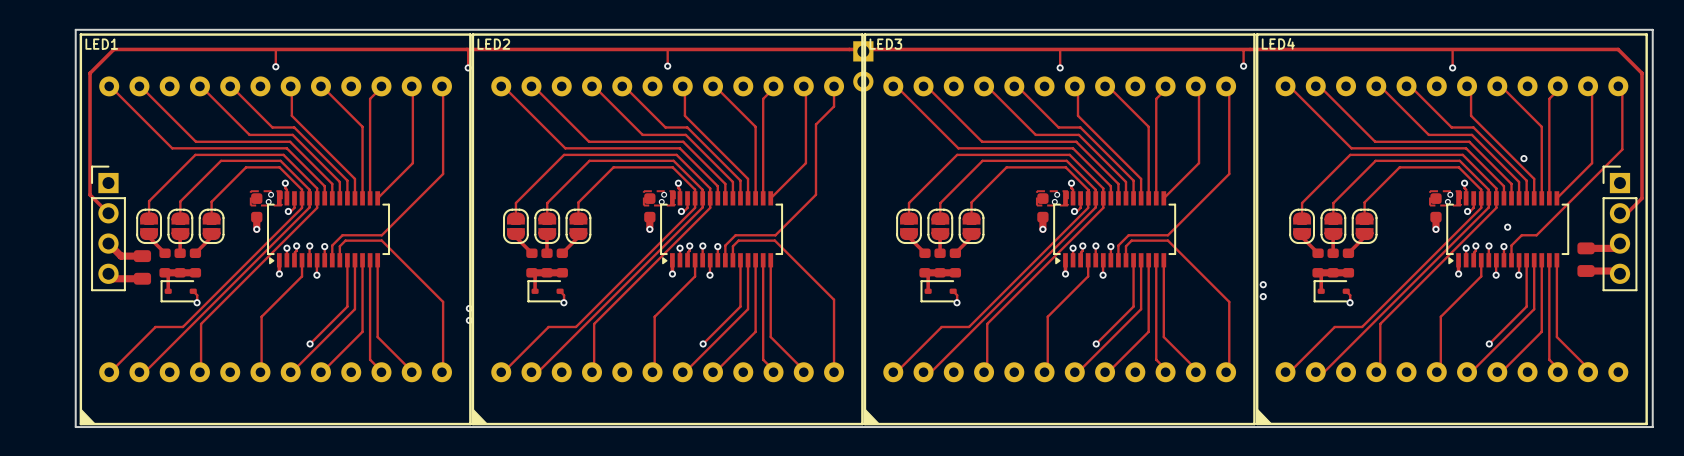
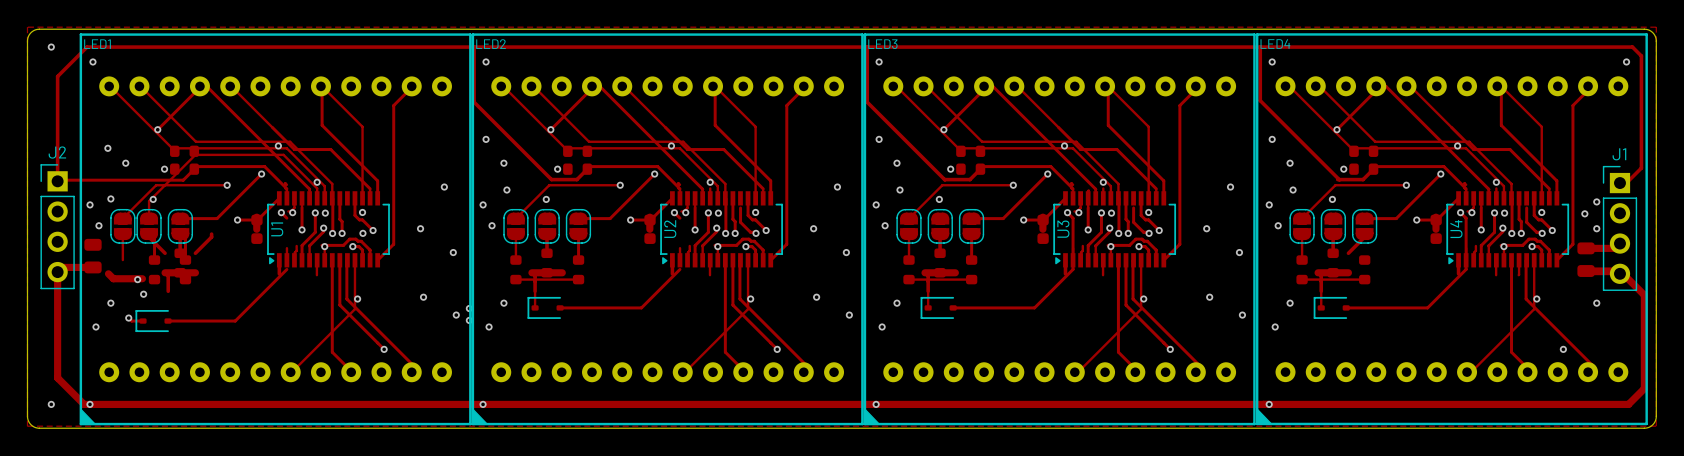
zone outline: none -> (27, 27) (27, 426) (1656, 426) (1656, 27) (27, 27)
board edge: (75, 29) (1652, 29) (1652, 427) (75, 427) (75, 29) -> (39, 29) (30, 32) (27, 41) (27, 416) (30, 423) (36, 427) (1644, 428) (1651, 425) (1656, 418) (1656, 41) (1653, 33) (1647, 29) (39, 29)
via: none -> (51, 47)
track: none -> (474, 47) (474, 102) (551, 179) (576, 179) (589, 166) (657, 166) (679, 188)
track: none -> (867, 47) (867, 102) (944, 179)
track: none -> (1260, 47) (1260, 100) (1339, 179)
track: (467, 49) (468, 67) -> none
track: (667, 49) (667, 66) -> (535, 291) (535, 307)
track: (1063, 49) (1060, 49) (1060, 67) -> none
track: (1242, 49) (1243, 66) -> none
track: (1456, 49) (1452, 49) (1452, 67) -> none
track: (275, 50) (275, 66) -> none
via: none -> (92, 61)
via: none -> (879, 61)
via: none -> (1626, 61)
via: (275, 66) -> none
via: (667, 66) -> none
part: (863, 66) -> none
via position: (1243, 66) -> (1272, 61)
via position: (468, 67) -> (486, 61)
via: (1060, 67) -> none
via: (1452, 67) -> none
track: (199, 86) (249, 134) (292, 134) (339, 181) (339, 198) -> (342, 233) (339, 198)
track: (290, 86) (291, 115) (354, 178) (354, 198) -> (373, 230) (354, 215) (354, 198)
track: (381, 86) (370, 98) (370, 188) -> none
track: (411, 86) (412, 163) (377, 198) -> (322, 86) (322, 125) (377, 180) (377, 198)
track: (441, 86) (443, 173) (381, 235) (342, 235) (332, 245) (332, 260) -> (352, 372) (332, 352) (332, 260)
track: (592, 86) (642, 134) (685, 134) (732, 181) (732, 198) -> (735, 233) (732, 198)
track: (683, 86) (684, 115) (748, 178) (748, 198) -> (766, 230) (748, 215) (748, 198)
track: (774, 86) (763, 98) (763, 188) -> none
track: (804, 86) (805, 163) (770, 198) -> (715, 86) (715, 125) (770, 180) (770, 198)
track: (834, 86) (834, 106) (815, 124) (815, 194) (775, 235) (735, 235) (725, 245) (725, 260) -> (745, 372) (725, 352) (725, 260)
track: (985, 86) (1035, 134) (1078, 134) (1125, 181) (1125, 198) -> (1128, 233) (1125, 198)
track: (1076, 86) (1077, 115) (1141, 178) (1141, 198) -> (1159, 230) (1141, 215) (1141, 198)
track: (1167, 86) (1156, 98) (1156, 188) -> none
track: (1197, 86) (1199, 163) (1163, 198) -> (1108, 86) (1108, 125) (1163, 180) (1163, 198)
track: (1227, 86) (1229, 173) (1167, 235) (1128, 235) (1118, 245) (1118, 260) -> (1138, 372) (1118, 352) (1118, 260)
track: (1378, 86) (1428, 134) (1471, 134) (1519, 181) (1519, 198) -> (1521, 233) (1519, 198)
track: (1469, 86) (1471, 115) (1534, 178) (1534, 198) -> (1552, 230) (1534, 215) (1534, 198)
track: (1560, 86) (1549, 98) (1549, 188) -> none
track: (1590, 86) (1592, 163) (1556, 198) -> (1501, 86) (1501, 125) (1556, 180) (1556, 198)
track: (1620, 86) (1622, 149) (1536, 235) (1521, 235) (1511, 245) (1511, 260) -> (1531, 372) (1511, 352) (1511, 260)
track: (272, 127) (294, 127) (347, 180) (347, 198) -> (272, 127) (294, 149) (330, 149) (370, 188)
track: (665, 127) (687, 127) (740, 180) (740, 198) -> (665, 127) (687, 149) (723, 149) (763, 188)
track: (1058, 127) (1080, 127) (1133, 180) (1133, 198) -> (1058, 127) (1080, 149) (1116, 149) (1156, 188)
track: (1451, 127) (1473, 127) (1526, 180) (1526, 198) -> (1451, 127) (1473, 149) (1510, 149) (1549, 188)
via: none -> (157, 129)
via: none -> (550, 129)
via: none -> (943, 129)
via: none -> (1336, 129)
via: none -> (486, 139)
via: none -> (879, 139)
via: none -> (1272, 139)
via: none -> (278, 145)
via: none -> (671, 145)
via: none -> (1064, 145)
via: none -> (1457, 145)
via: none -> (107, 148)
part: none -> (184, 151)
part: none -> (577, 151)
part: none -> (970, 151)
part: none -> (1363, 151)
J1 name: none -> J1 (1619, 154)
via: (1523, 158) -> none
via: none -> (125, 163)
via: none -> (503, 163)
via: none -> (896, 163)
via: none -> (1290, 163)
via: none -> (164, 169)
part: none -> (184, 169)
via: none -> (557, 169)
part: none -> (577, 169)
via: none -> (950, 169)
part: none -> (970, 169)
via: none -> (1343, 169)
part: none -> (1363, 169)
track: none -> (261, 174) (217, 218) (185, 218)
via: none -> (261, 174)
via: none -> (654, 174)
via: none -> (1047, 174)
via: none -> (1440, 174)
track: none -> (944, 179) (969, 179) (983, 166) (1050, 166) (1073, 188)
track: none -> (1337, 179) (1363, 179) (1376, 166) (1443, 166) (1466, 188)
track: none -> (1628, 181) (1641, 168) (1641, 56) (1632, 47) (87, 47) (57, 76) (57, 181) (183, 180) (196, 166) (264, 166) (286, 188)
via: none -> (317, 182)
via: none -> (710, 182)
via: none -> (1103, 182)
via: none -> (1496, 182)
via: (285, 183) -> none
via: (678, 183) -> none
via: (1071, 183) -> none
via: (1464, 183) -> none
track: none -> (227, 185) (156, 185) (122, 218)
via: none -> (227, 185)
via: none -> (620, 185)
via: none -> (1013, 185)
via: none -> (1406, 185)
via: none -> (444, 187)
via: none -> (837, 187)
via: none -> (1230, 187)
track: (710, 188) (676, 154) (564, 154) (515, 203) (515, 218) -> (620, 185) (549, 185) (515, 218)
track: (1103, 188) (1069, 154) (957, 154) (909, 203) (909, 218) -> (1013, 185) (942, 185) (909, 218)
track: (1496, 188) (1462, 154) (1350, 154) (1302, 203) (1302, 218) -> (1406, 185) (1335, 185) (1302, 218)
track: (309, 189) (280, 160) (221, 160) (180, 201) (180, 218) -> (309, 189) (206, 86) (201, 86) (157, 129)
track: (702, 189) (673, 160) (589, 160) (547, 203) (547, 218) -> (702, 189) (599, 86) (594, 86) (550, 129)
track: (1095, 189) (1066, 160) (982, 160) (940, 203) (940, 218) -> (1095, 189) (992, 86) (987, 86) (943, 129)
track: (1488, 189) (1459, 160) (1375, 160) (1333, 203) (1333, 218) -> (1488, 189) (1385, 86) (1380, 86) (1336, 129)
via: none -> (506, 190)
via: none -> (899, 190)
track: (1088, 190) (1065, 167) (1006, 167) (971, 202) (971, 218) -> (1047, 174) (1003, 218) (971, 218)
via: none -> (1293, 190)
zone outline: (250, 191) (281, 191) (281, 205) (250, 205) (250, 191) -> none
zone outline: (643, 191) (674, 191) (674, 205) (643, 205) (643, 191) -> none
zone outline: (1036, 191) (1067, 191) (1067, 205) (1036, 205) (1036, 191) -> none
zone outline: (1430, 191) (1461, 191) (1461, 205) (1430, 205) (1430, 191) -> none
via: (271, 194) -> none
via: (664, 194) -> none
via: (1057, 194) -> none
via: (1450, 194) -> none
via: none -> (110, 198)
track: none -> (279, 198) (257, 220) (237, 220)
track: (302, 198) (302, 189) (279, 167) (246, 167) (211, 201) (211, 218) -> none
track: (309, 198) (309, 207) (144, 372) (139, 372) (140, 363) -> none
track: (317, 198) (317, 207) (201, 323) (199, 372) -> none
track: none -> (332, 198) (332, 233)
track: none -> (672, 198) (650, 220) (630, 220)
track: (695, 198) (695, 189) (672, 167) (613, 167) (578, 202) (578, 218) -> (654, 174) (610, 218) (578, 218)
track: (702, 198) (702, 207) (537, 372) (532, 372) (533, 363) -> none
track: (710, 198) (710, 207) (594, 323) (592, 372) -> none
track: none -> (725, 198) (725, 233)
track: none -> (1065, 198) (1043, 220) (1023, 220)
track: (1095, 198) (1095, 207) (930, 372) (925, 372) (926, 363) -> none
track: (1103, 198) (1103, 207) (987, 323) (985, 372) -> none
track: none -> (1118, 198) (1118, 233)
track: none -> (1458, 198) (1436, 220) (1416, 220)
track: (1481, 198) (1481, 189) (1458, 167) (1399, 167) (1364, 202) (1364, 218) -> (1440, 174) (1396, 218) (1364, 218)
track: (1488, 198) (1488, 207) (1324, 372) (1318, 372) (1319, 363) -> none
track: (1496, 198) (1496, 207) (1380, 323) (1378, 372) -> none
track: none -> (1511, 198) (1511, 233)
via: none -> (153, 199)
via: none -> (546, 199)
via: none -> (939, 199)
via: none -> (1332, 199)
via: (268, 201) -> none
via: (661, 201) -> none
via: (1054, 201) -> none
via: (1447, 201) -> none
via: none -> (1596, 201)
via: none -> (90, 204)
via: none -> (483, 204)
via: none -> (876, 204)
via: none -> (1269, 204)
part position: (256, 207) -> (256, 229)
track: (302, 207) (182, 326) (155, 326) (108, 372) -> (302, 207) (302, 229)
part position: (649, 207) -> (650, 229)
track: (695, 207) (575, 326) (548, 326) (501, 372) -> (695, 207) (695, 229)
track: none -> (740, 207) (740, 222) (750, 232) (756, 233)
part position: (1042, 207) -> (1043, 229)
track: (1088, 207) (969, 326) (941, 326) (894, 372) -> (1088, 207) (1088, 229)
track: none -> (1133, 207) (1133, 222) (1143, 232) (1149, 233)
part position: (1435, 207) -> (1436, 229)
track: (1481, 207) (1362, 326) (1334, 326) (1288, 372) -> (1481, 207) (1481, 229)
track: none -> (1526, 207) (1526, 222) (1536, 232) (1542, 233)
via: (288, 211) -> none
via: (681, 211) -> none
via: (1074, 211) -> none
via: (1467, 211) -> none
track: none -> (281, 212) (286, 218)
via: none -> (281, 212)
via: none -> (292, 212)
via: none -> (315, 212)
via: none -> (362, 212)
track: none -> (674, 212) (679, 218)
via: none -> (674, 212)
via: none -> (685, 212)
via: none -> (708, 212)
via: none -> (755, 212)
track: none -> (1067, 212) (1073, 218) (1073, 269) (1034, 307) (953, 307)
via: none -> (1067, 212)
via: none -> (1078, 212)
via: none -> (1101, 212)
via: none -> (1148, 212)
track: none -> (1460, 212) (1466, 218) (1466, 269) (1427, 307) (1346, 307)
via: none -> (1460, 212)
via: none -> (1471, 212)
via: none -> (1494, 212)
via: none -> (1541, 212)
track: (108, 213) (90, 194) (90, 73) (113, 49) (1618, 49) (1642, 73) (1642, 198) (1625, 215) (1619, 215) -> none
via: none -> (325, 213)
via: none -> (718, 213)
via: none -> (1111, 213)
via: none -> (1504, 213)
via: none -> (1584, 213)
via: none -> (237, 220)
via: none -> (630, 220)
via: none -> (1023, 220)
via: none -> (1416, 220)
via: none -> (98, 225)
via: none -> (492, 225)
via: none -> (885, 225)
via: none -> (1278, 225)
J2: none -> (57, 226)
part position: (211, 226) -> (122, 226)
via: (1507, 227) -> none
part: (108, 228) -> none
track: none -> (323, 228) (323, 231) (309, 246)
via: none -> (323, 228)
via: none -> (420, 228)
track: none -> (716, 228) (716, 231) (702, 246)
via: none -> (716, 228)
via: none -> (813, 228)
track: none -> (1109, 228) (1109, 231) (1095, 246)
via: none -> (1109, 228)
via: none -> (1206, 228)
U4 name: none -> U4 (1456, 229)
track: none -> (1502, 228) (1502, 231) (1488, 246)
via: none -> (1502, 228)
via: none -> (1596, 228)
via: (256, 229) -> none
U1 name: none -> U1 (277, 229)
via: none -> (302, 229)
via: (649, 229) -> none
U2 name: none -> U2 (670, 229)
via: none -> (695, 229)
via: (1042, 229) -> none
U3 name: none -> U3 (1063, 229)
via: none -> (1088, 229)
via: (1435, 229) -> none
via: none -> (1481, 229)
via: none -> (373, 230)
via: none -> (766, 230)
via: none -> (1159, 230)
via: none -> (1552, 230)
via: none -> (332, 233)
via: none -> (342, 233)
via: none -> (362, 233)
via: none -> (725, 233)
via: none -> (735, 233)
via: none -> (756, 233)
via: none -> (1118, 233)
via: none -> (1128, 233)
via: none -> (1149, 233)
via: none -> (1511, 233)
via: none -> (1521, 233)
via: none -> (1542, 233)
track: none -> (122, 234) (122, 260)
track: none -> (154, 234) (154, 260)
track: none -> (185, 234) (185, 260)
track: (578, 234) (578, 237) (562, 253) -> (578, 234) (578, 260)
track: (971, 234) (971, 237) (955, 253) -> (971, 234) (971, 260)
track: (515, 237) (531, 253) -> (515, 237) (515, 260)
track: (909, 237) (924, 253) -> (909, 237) (909, 260)
track: (1302, 237) (1318, 253) -> (1302, 237) (1302, 260)
track: (108, 243) (121, 256) (142, 256) -> none
via: (296, 245) -> none
via: (309, 245) -> none
via: (689, 245) -> none
via: (702, 245) -> none
via: (1082, 245) -> none
via: (1095, 245) -> none
via: (1475, 245) -> none
via: (1488, 245) -> none
via: none -> (352, 246)
via: none -> (745, 246)
via: none -> (1138, 246)
via: none -> (1532, 246)
via: (286, 248) -> none
via: (680, 248) -> none
via: (1073, 248) -> none
via: (1466, 248) -> none
via: none -> (453, 252)
via: none -> (846, 252)
via: none -> (1239, 252)
track: (302, 260) (302, 276) (261, 316) (260, 372) -> (302, 260) (302, 245) (315, 232) (315, 212)
track: (339, 260) (339, 246) (345, 240) (381, 240) (443, 301) (441, 372) -> (339, 260) (339, 305) (384, 349)
track: (347, 260) (347, 306) (310, 343) -> (347, 260) (346, 298) (412, 364) (412, 372)
track: (362, 260) (362, 331) (320, 372) -> (362, 260) (362, 250) (358, 246) (352, 246)
track: (370, 260) (370, 359) (381, 372) -> (370, 260) (370, 250) (361, 241) (355, 239) (349, 239) (343, 245) (321, 245)
track: (377, 260) (377, 337) (411, 372) -> (377, 260) (393, 244) (393, 105) (412, 86)
track: (695, 260) (695, 276) (654, 316) (653, 372) -> (695, 260) (695, 245) (708, 232) (708, 212)
track: (732, 260) (732, 246) (738, 240) (774, 240) (834, 299) (834, 372) -> (732, 260) (732, 305) (777, 349)
track: (740, 260) (740, 306) (703, 343) -> (740, 260) (739, 298) (805, 364) (805, 372)
track: (755, 260) (755, 331) (713, 372) -> (755, 260) (755, 250) (752, 246) (745, 246)
track: (763, 260) (763, 359) (774, 372) -> (763, 260) (763, 250) (754, 241) (748, 239) (742, 239) (736, 245) (714, 245)
track: (770, 260) (770, 337) (804, 372) -> (770, 260) (786, 244) (786, 105) (805, 86)
track: (1088, 260) (1088, 276) (1047, 316) (1046, 372) -> (1088, 260) (1088, 245) (1101, 232) (1101, 212)
track: (1125, 260) (1125, 246) (1131, 240) (1167, 240) (1229, 301) (1227, 372) -> (1125, 260) (1125, 305) (1170, 349)
track: (1133, 260) (1133, 306) (1096, 343) -> (1133, 260) (1133, 298) (1199, 364) (1199, 372)
track: (1148, 260) (1148, 331) (1106, 372) -> (1148, 260) (1148, 250) (1145, 246) (1138, 246)
track: (1156, 260) (1156, 359) (1167, 372) -> (1156, 260) (1156, 250) (1147, 241) (1142, 239) (1135, 239) (1129, 245) (1108, 245)
track: (1163, 260) (1163, 337) (1197, 372) -> (1163, 260) (1179, 244) (1179, 105) (1199, 86)
track: (1481, 260) (1481, 276) (1440, 316) (1439, 372) -> (1481, 260) (1481, 245) (1494, 232) (1494, 212)
track: (1526, 260) (1526, 306) (1489, 343) -> (1526, 260) (1526, 298) (1592, 364) (1592, 372)
track: (1541, 260) (1541, 331) (1499, 372) -> (1541, 260) (1541, 250) (1538, 246) (1532, 246)
track: (1549, 260) (1549, 359) (1560, 372) -> (1549, 260) (1549, 250) (1540, 241) (1535, 239) (1528, 239) (1522, 245) (1501, 245)
track: (1556, 260) (1556, 337) (1590, 372) -> (1556, 260) (1572, 244) (1572, 105) (1592, 86)
part: (165, 263) -> none
part: (195, 263) -> none
part position: (531, 263) -> (515, 269)
part position: (562, 263) -> (578, 269)
part position: (924, 263) -> (909, 269)
part position: (955, 263) -> (971, 269)
part position: (1318, 263) -> (1302, 269)
part position: (1348, 263) -> (1364, 269)
track: none -> (93, 267) (62, 267) (57, 272) (57, 377) (84, 404) (1628, 404) (1644, 388) (1644, 295) (1620, 271) (1589, 271)
part position: (142, 267) -> (93, 256)
part: none -> (154, 269)
part: none -> (185, 269)
track: none -> (286, 269) (235, 321) (168, 321)
track: none -> (679, 269) (641, 307) (560, 307)
via: (279, 273) -> none
via: (672, 273) -> none
via: (1065, 273) -> none
via: (1458, 273) -> none
via: (316, 275) -> none
via: (709, 275) -> none
via: (1103, 275) -> none
via: (1496, 275) -> none
via: (1518, 275) -> none
via: none -> (137, 279)
track: none -> (515, 279) (578, 279)
track: none -> (909, 279) (971, 279)
track: none -> (1302, 279) (1364, 279)
via: (1263, 284) -> none
part position: (178, 291) -> (153, 321)
track: (193, 291) (197, 295) (197, 302) -> none
part position: (545, 291) -> (545, 307)
track: (560, 291) (564, 295) (563, 302) -> none
track: none -> (928, 291) (928, 307)
part position: (938, 291) -> (938, 307)
track: (953, 291) (957, 295) (956, 302) -> none
track: none -> (1321, 291) (1321, 307)
part position: (1331, 291) -> (1331, 307)
track: (1346, 291) (1350, 295) (1350, 302) -> none
via: none -> (143, 294)
via: (1263, 296) -> none
via: none -> (423, 297)
via: none -> (816, 297)
via: none -> (1209, 297)
via: none -> (357, 299)
via: none -> (750, 299)
via: none -> (1143, 299)
via: none -> (1536, 299)
via: (197, 302) -> none
via: (563, 302) -> none
via: (956, 302) -> none
via: (1350, 302) -> none
via: none -> (110, 303)
via: none -> (503, 303)
via: none -> (897, 303)
via: none -> (1290, 303)
via: none -> (1596, 303)
via: none -> (456, 315)
via: none -> (849, 315)
via: none -> (1242, 315)
track: none -> (128, 318) (131, 321) (143, 321)
via: none -> (128, 318)
via: none -> (95, 326)
via: none -> (489, 326)
via: none -> (882, 326)
via: none -> (1275, 326)
via: (310, 343) -> none
via: (703, 343) -> none
via: (1096, 343) -> none
via: (1489, 343) -> none
via: none -> (384, 349)
via: none -> (777, 349)
via: none -> (1170, 349)
via: none -> (1563, 349)
via: none -> (51, 404)
via: none -> (89, 404)
via: none -> (483, 404)
via: none -> (876, 404)
via: none -> (1269, 404)

